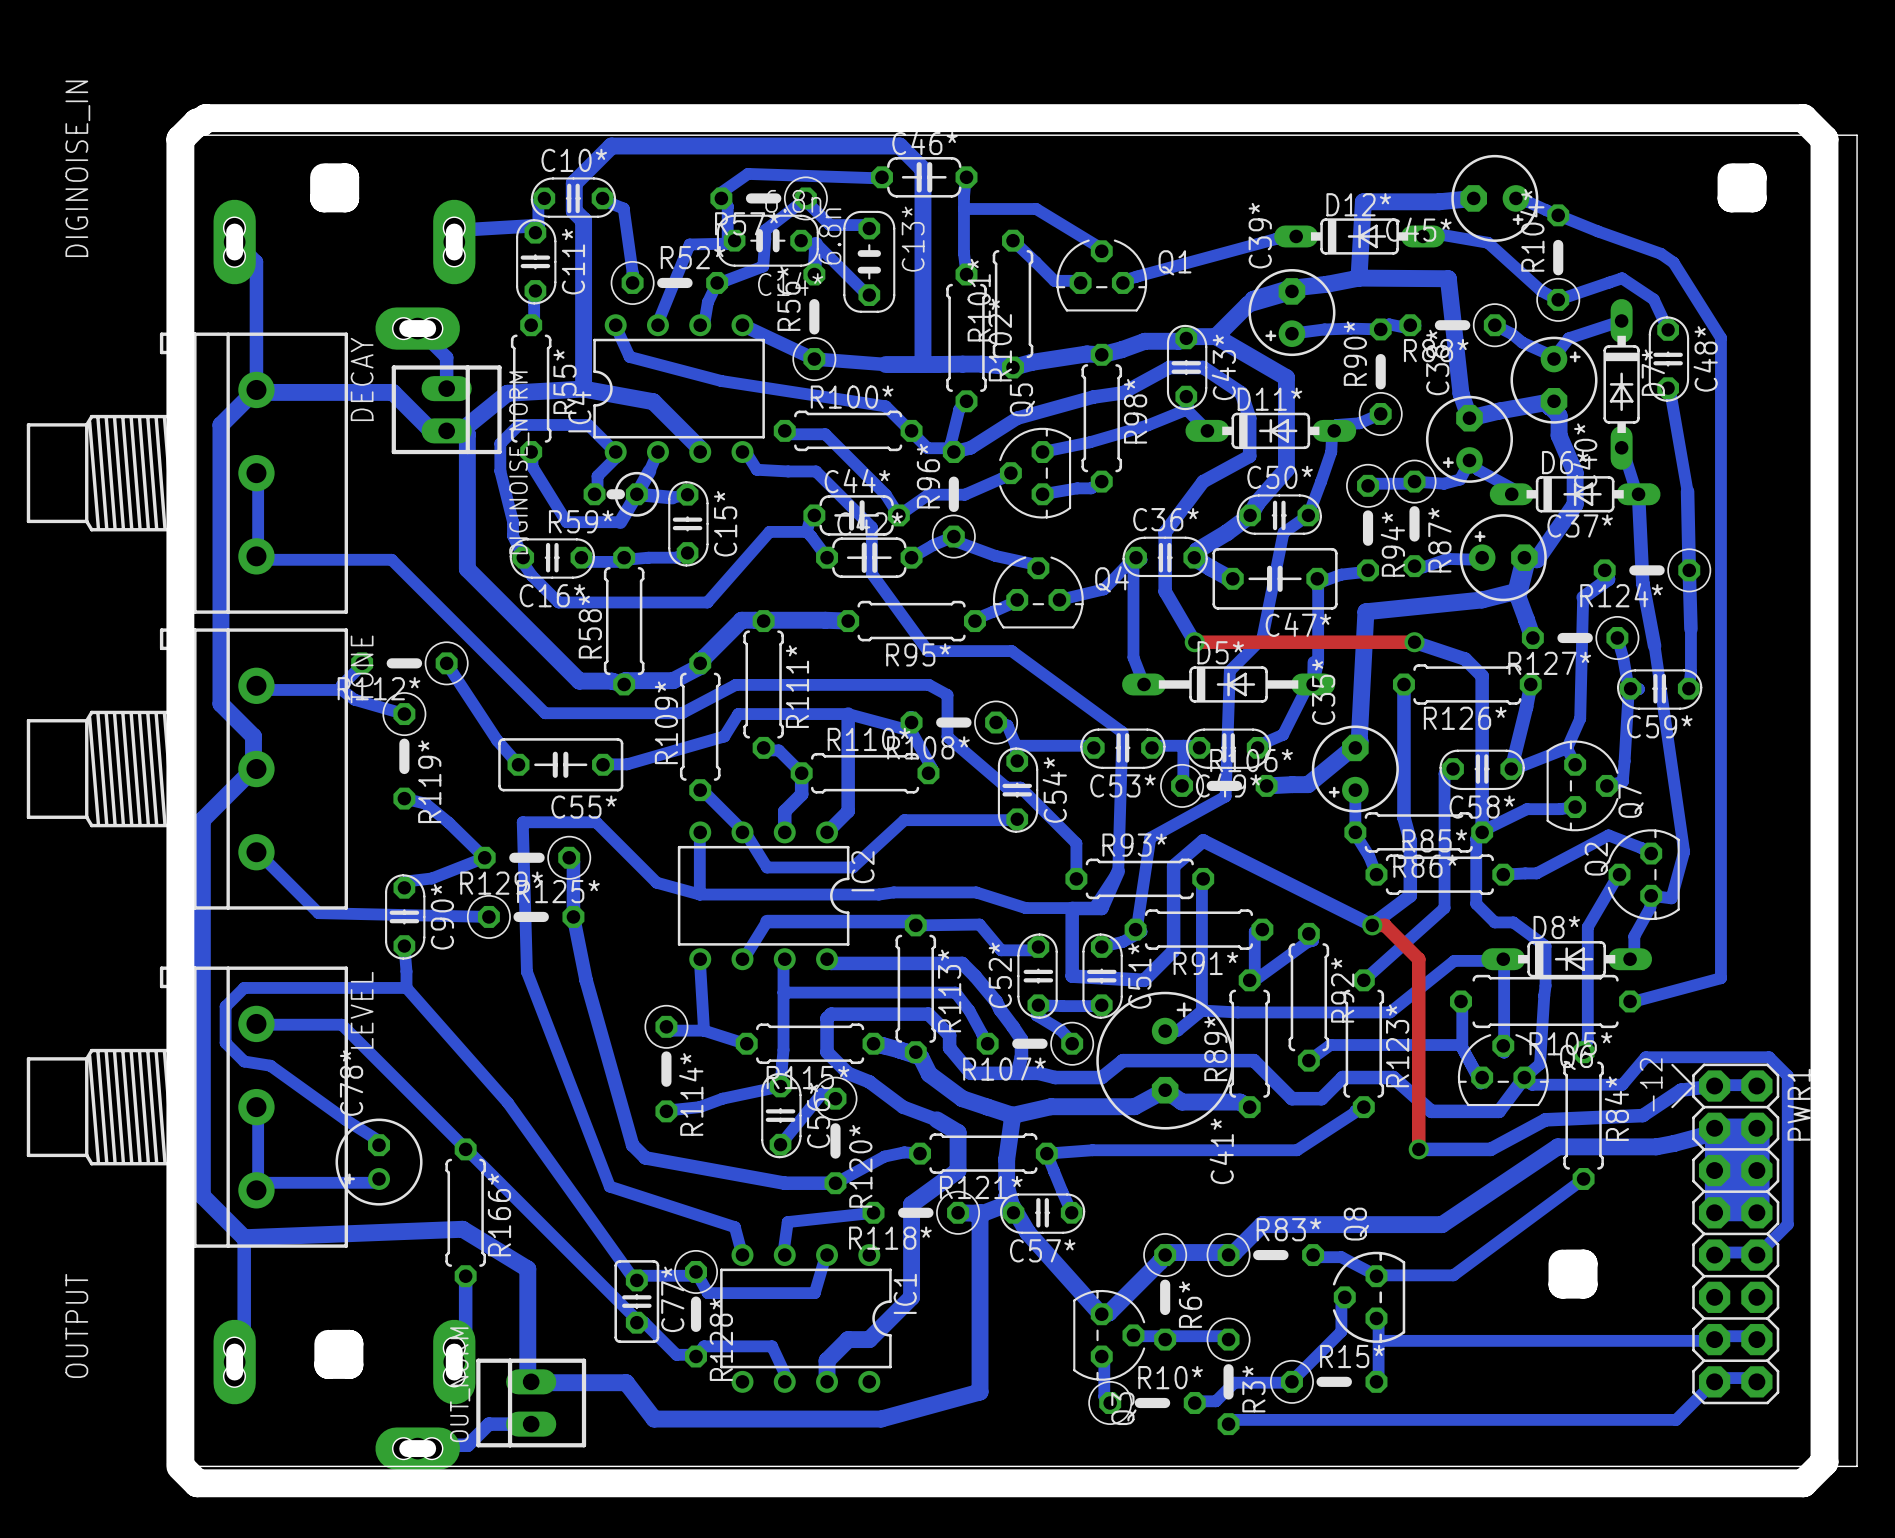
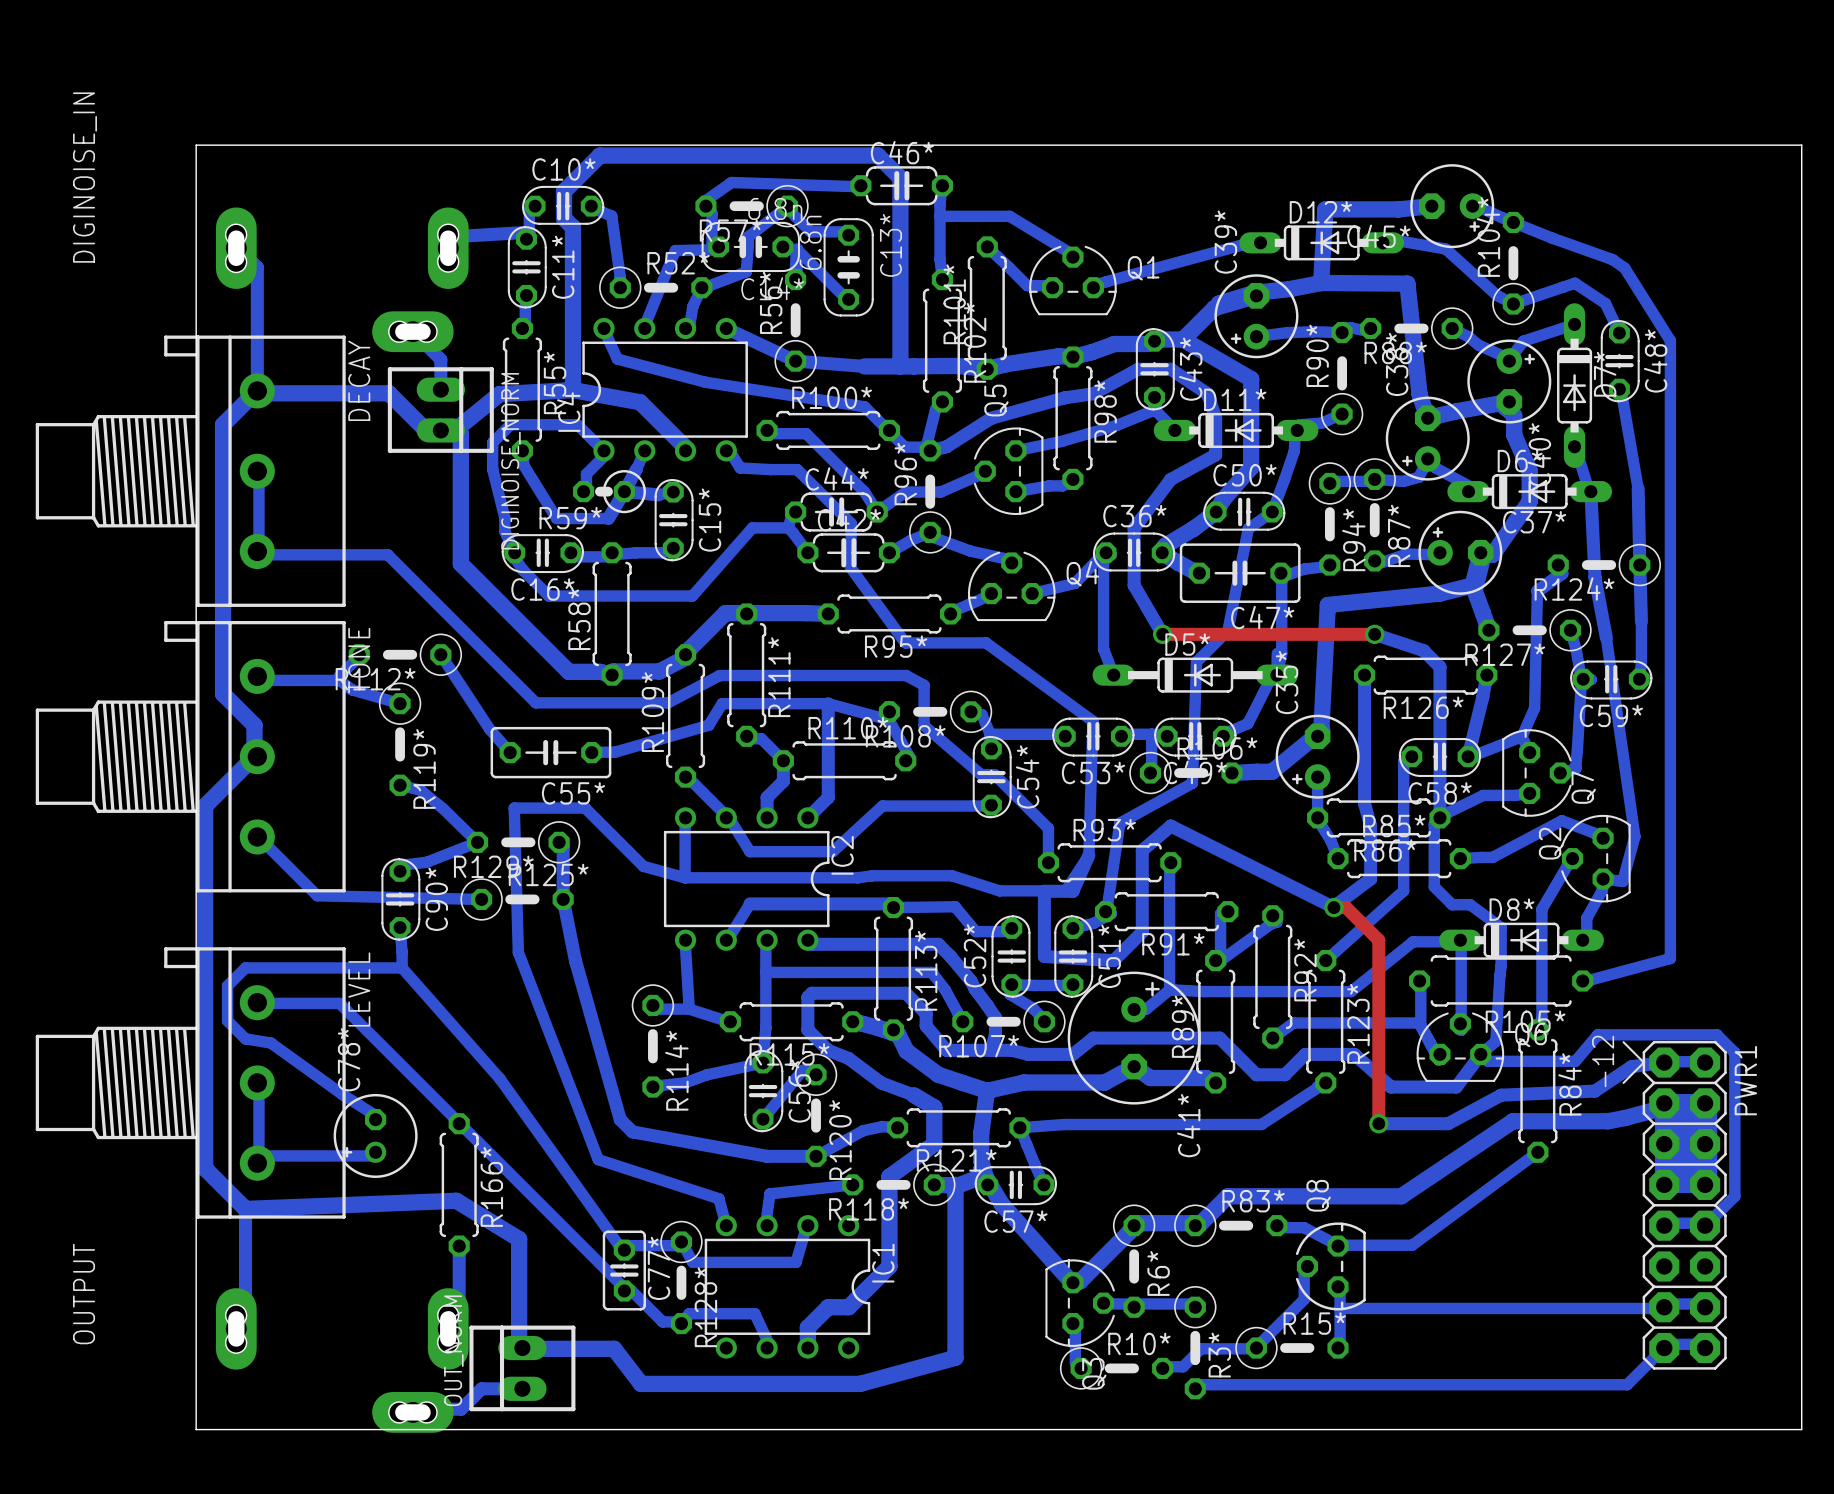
board edge: (324, 177) (324, 198) (345, 198) (345, 177) (328, 177) -> none
board edge: (1731, 177) (1731, 198) (1752, 198) (1752, 177) (1735, 177) -> none
board edge: (1562, 1263) (1562, 1284) (1583, 1284) (1583, 1263) (1566, 1263) -> none
board edge: (328, 1343) (328, 1364) (349, 1364) (349, 1343) (332, 1343) -> none
board edge: (180, 1462) (180, 139) (197, 122) (201, 122) (205, 118) (1803, 118) (1824, 139) (1824, 1462) (1803, 1483) (197, 1483) (180, 1466) -> none

